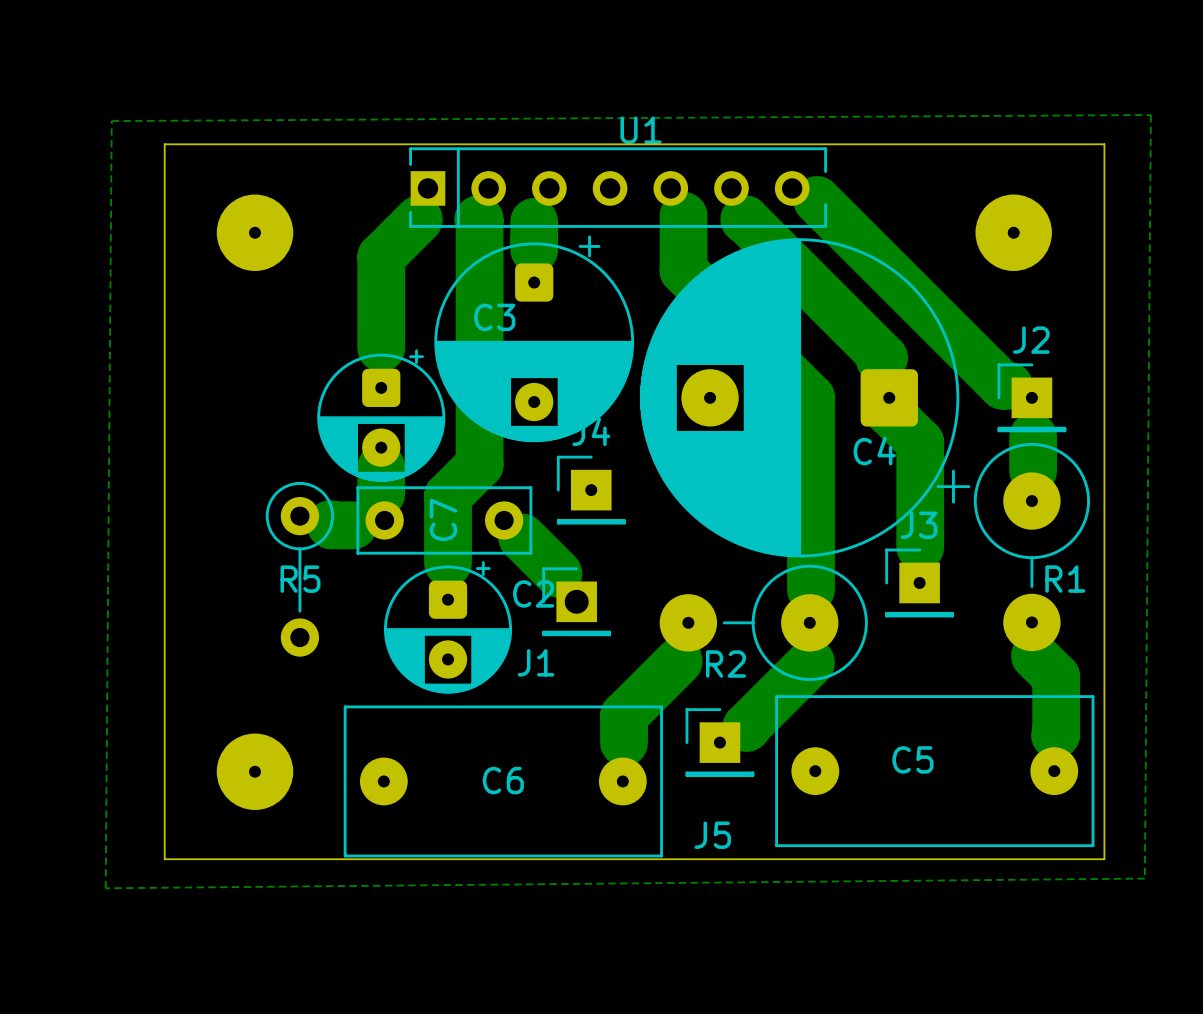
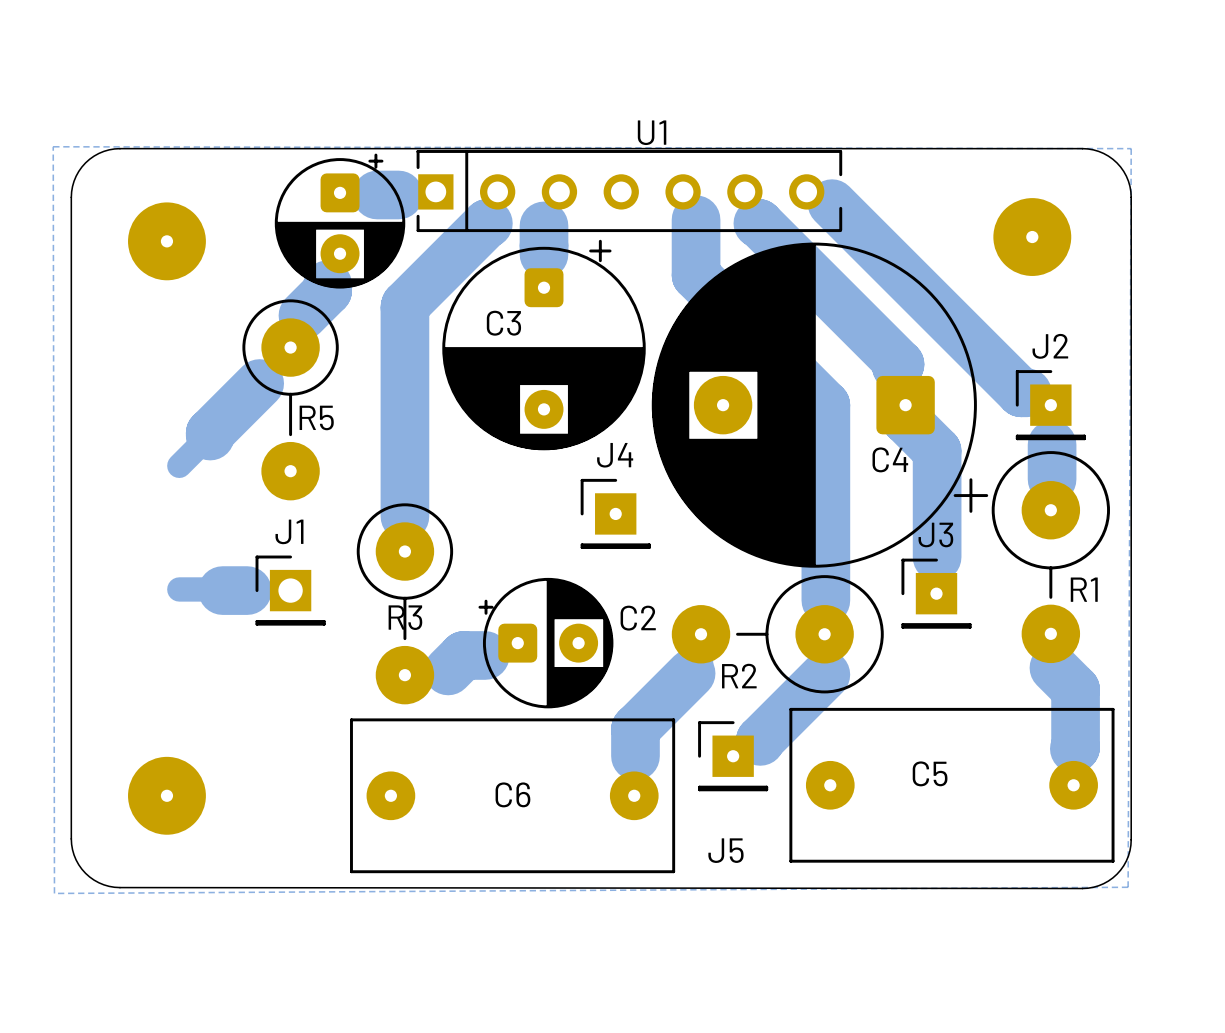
bottom zone outline: (1150, 115) (111, 121) (105, 888) (1144, 878) (1150, 115) -> (53, 146) (54, 893) (1128, 887) (1131, 148) (53, 146)
board edge: (164, 144) (1104, 144) (1104, 859) (164, 859) (164, 144) -> (119, 148) (98, 153) (85, 162) (76, 176) (71, 197) (71, 838) (76, 860) (89, 876) (103, 884) (119, 887) (1082, 888) (1103, 883) (1120, 870) (1128, 855) (1131, 839) (1131, 197) (1126, 176) (1112, 159) (1098, 151) (1082, 148) (119, 148)
bottom track: none -> (340, 192) (398, 195)
bottom track: (418, 219) (381, 257) (381, 387) -> none
bottom track: (478, 219) (479, 464) (448, 496) (448, 562) -> (487, 223) (405, 305) (404, 551)
part position: (255, 232) -> (166, 241)
bottom track: none -> (327, 284) (327, 290) (290, 327) (290, 347)
bottom track: none -> (259, 383) (179, 465)
part position: (381, 415) -> (340, 221)
bottom track: (381, 447) (381, 493) -> none
R5 footprint: [265, 481, 335, 657] -> [242, 299, 339, 501]
J4 position: (591, 490) -> (615, 513)
C7: (444, 520) -> none
bottom track: (504, 520) (558, 573) -> none
bottom track: (330, 524) (354, 526) -> none
bottom track: none -> (179, 589) (247, 590)
R3: none -> (404, 603)
J1 position: (576, 601) -> (290, 590)
C2 rotation: 0° (448, 627) -> 90° counterclockwise (545, 643)
C2 position: (448, 627) -> (545, 643)
bottom track: none -> (485, 655) (463, 655) (443, 675) (404, 675)
J1 name position: J1 (536, 662) -> J1 (289, 531)
part position: (255, 771) -> (166, 795)

